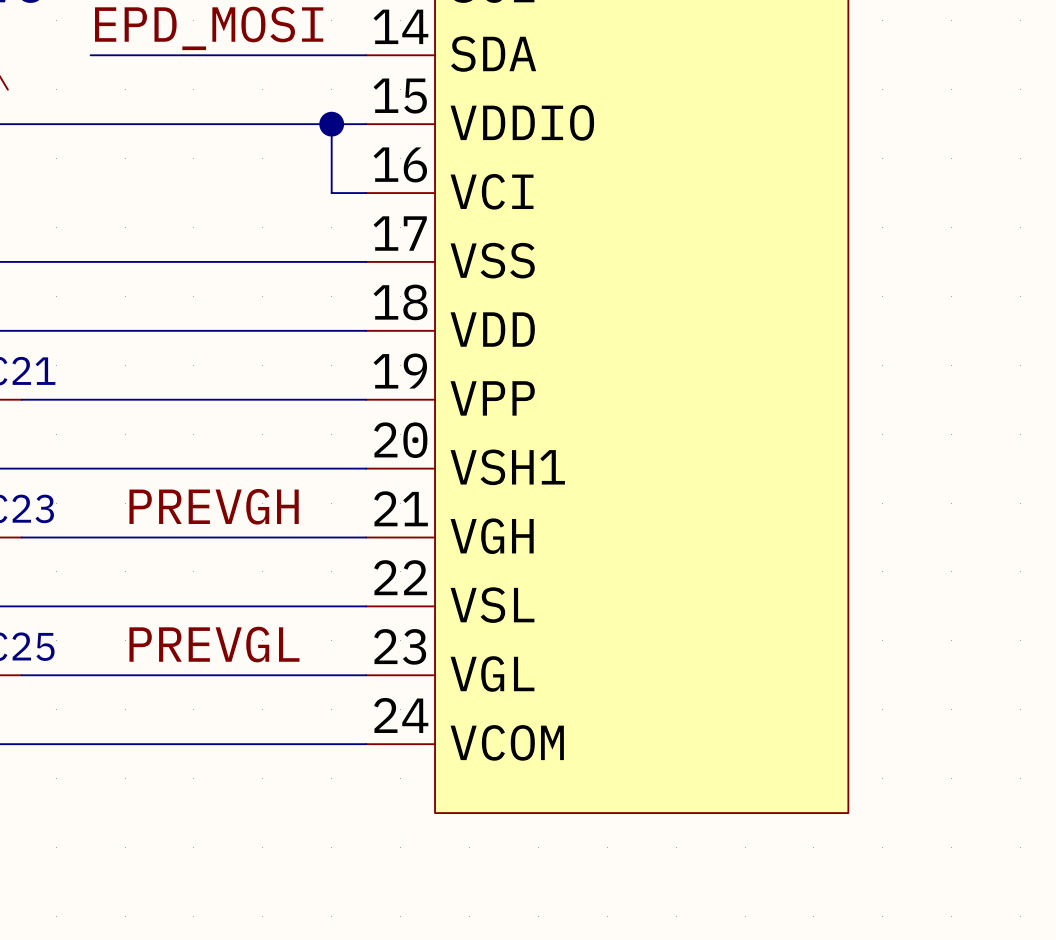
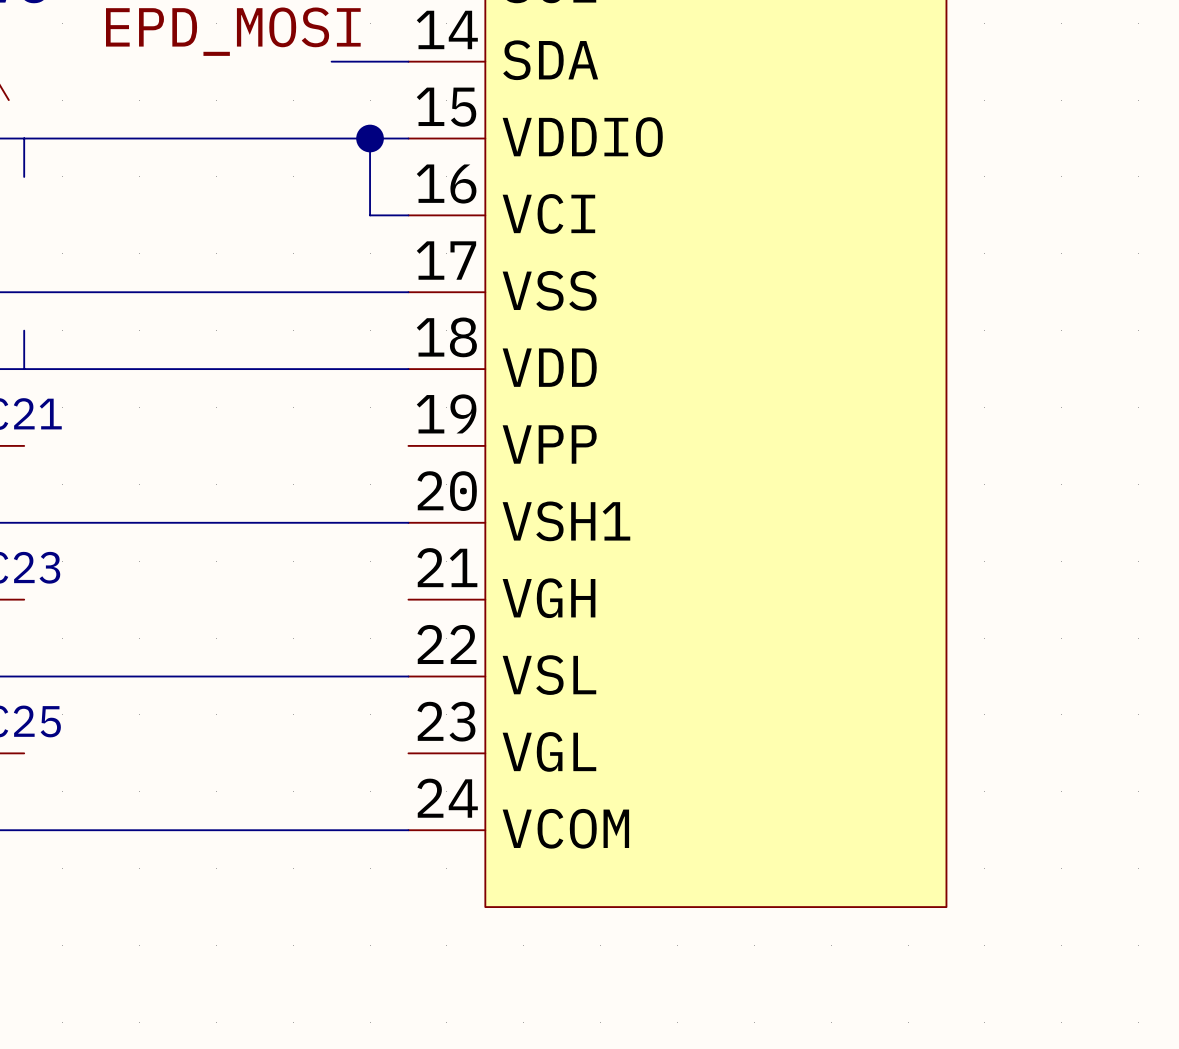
wire: (90, 55) (297, 55) -> none
wire: none -> (24, 138) (24, 176)
wire: none -> (24, 330) (24, 369)
wire: (21, 399) (366, 399) -> none
label: PREVGH (214, 506) -> none
wire: (21, 537) (366, 537) -> none
label: PREVGL (214, 644) -> none
wire: (21, 675) (366, 675) -> none

